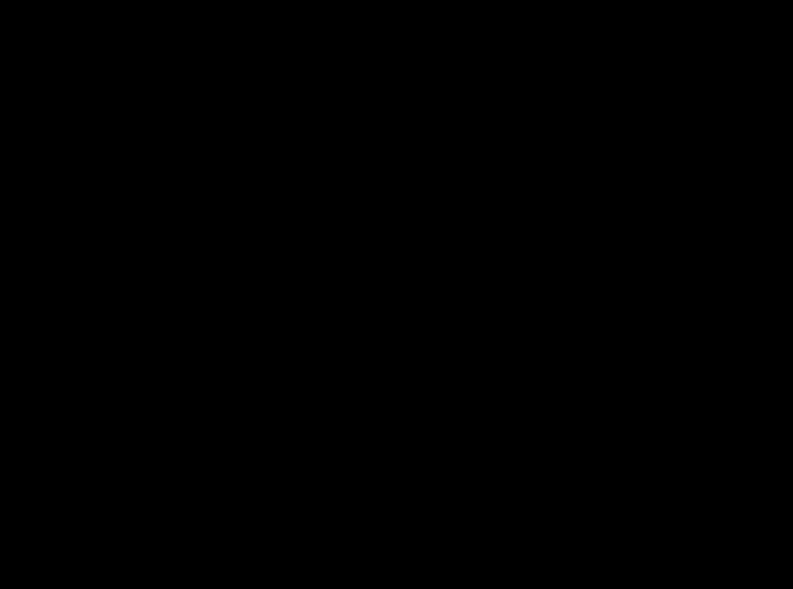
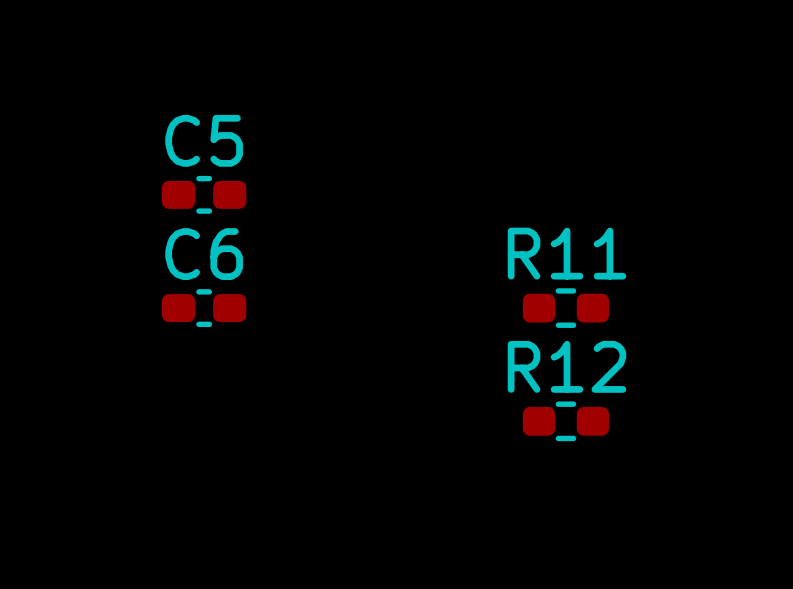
C5: none -> (204, 194)
C6: none -> (204, 308)
R11: none -> (565, 308)
R12: none -> (565, 421)

